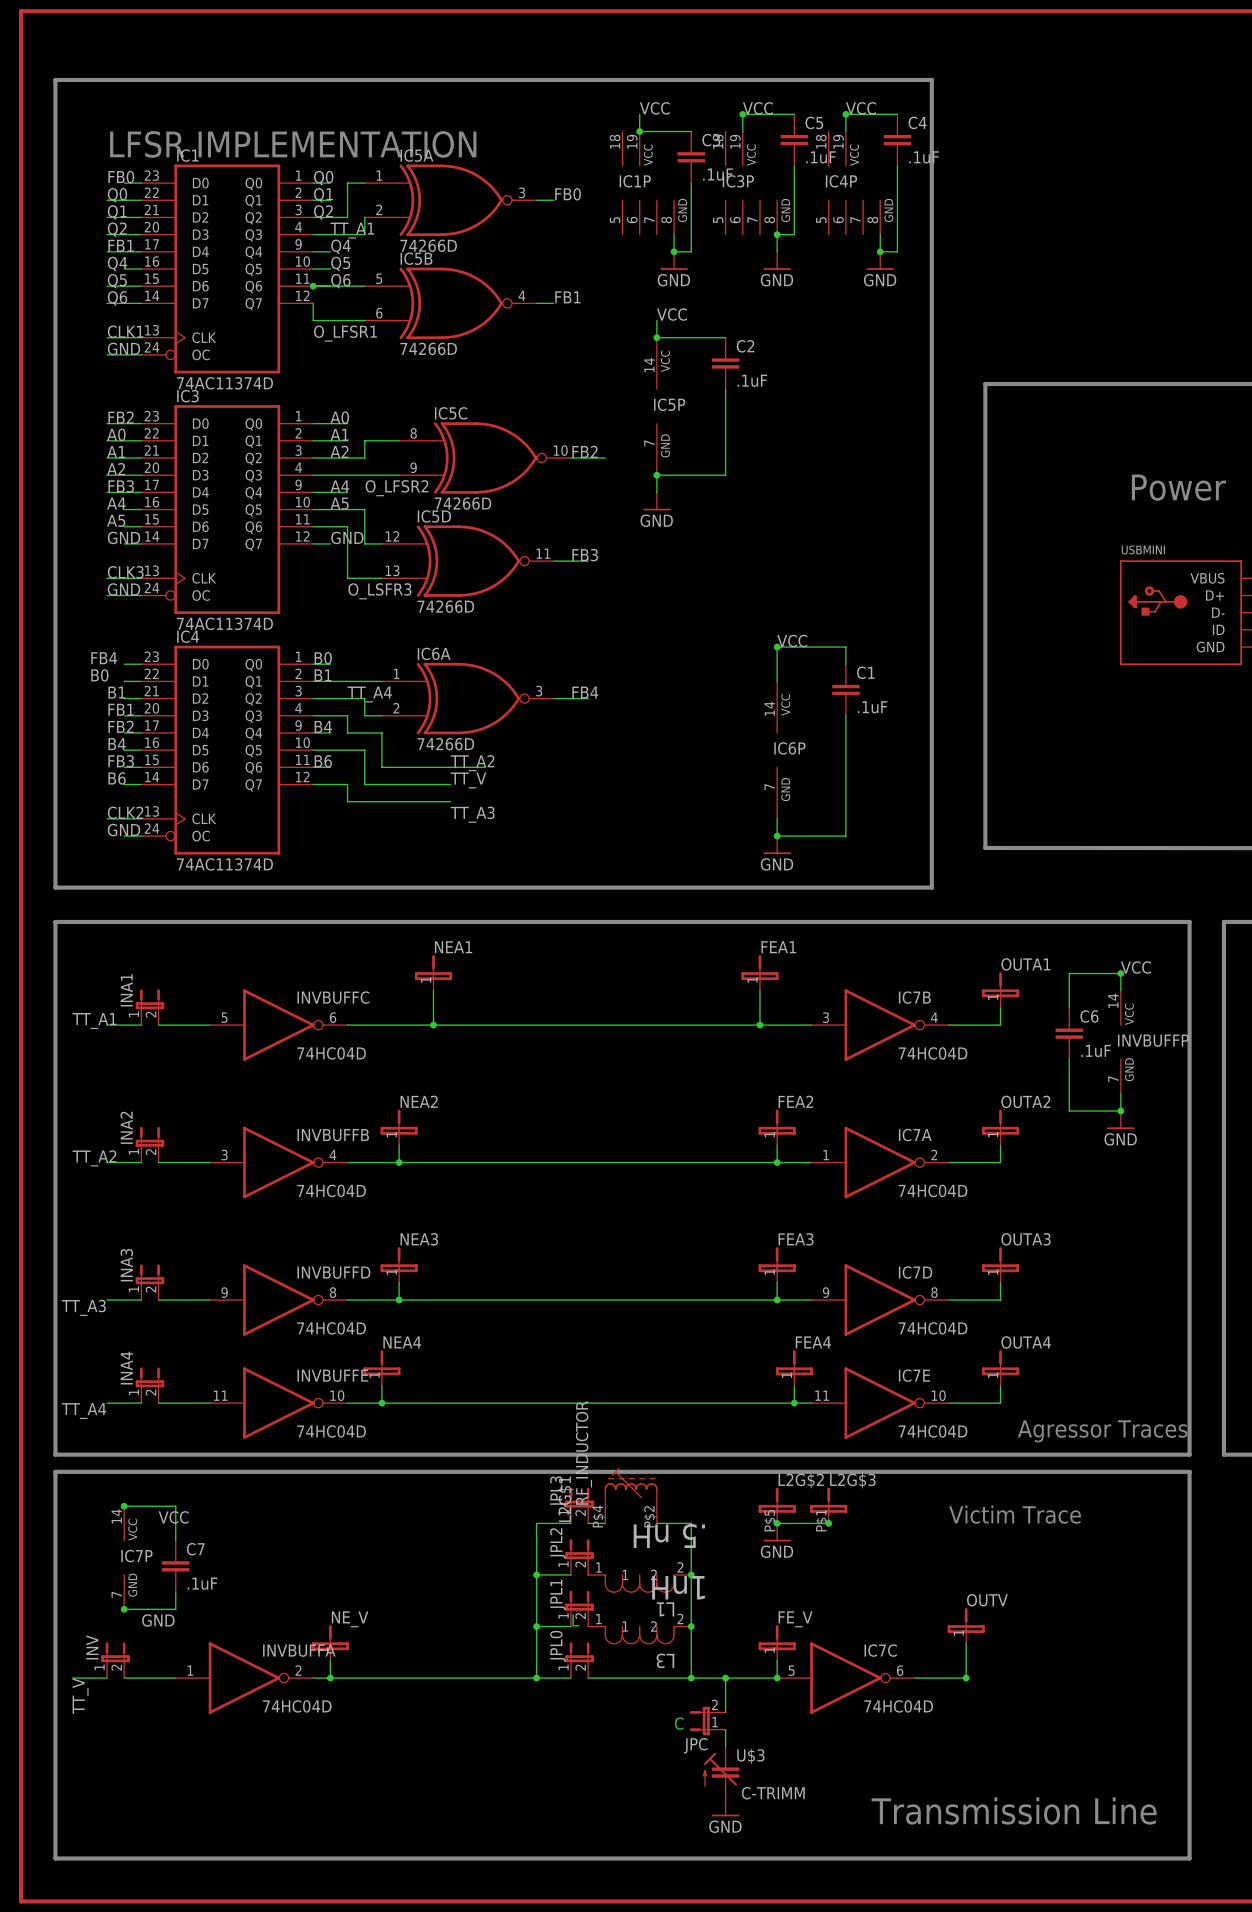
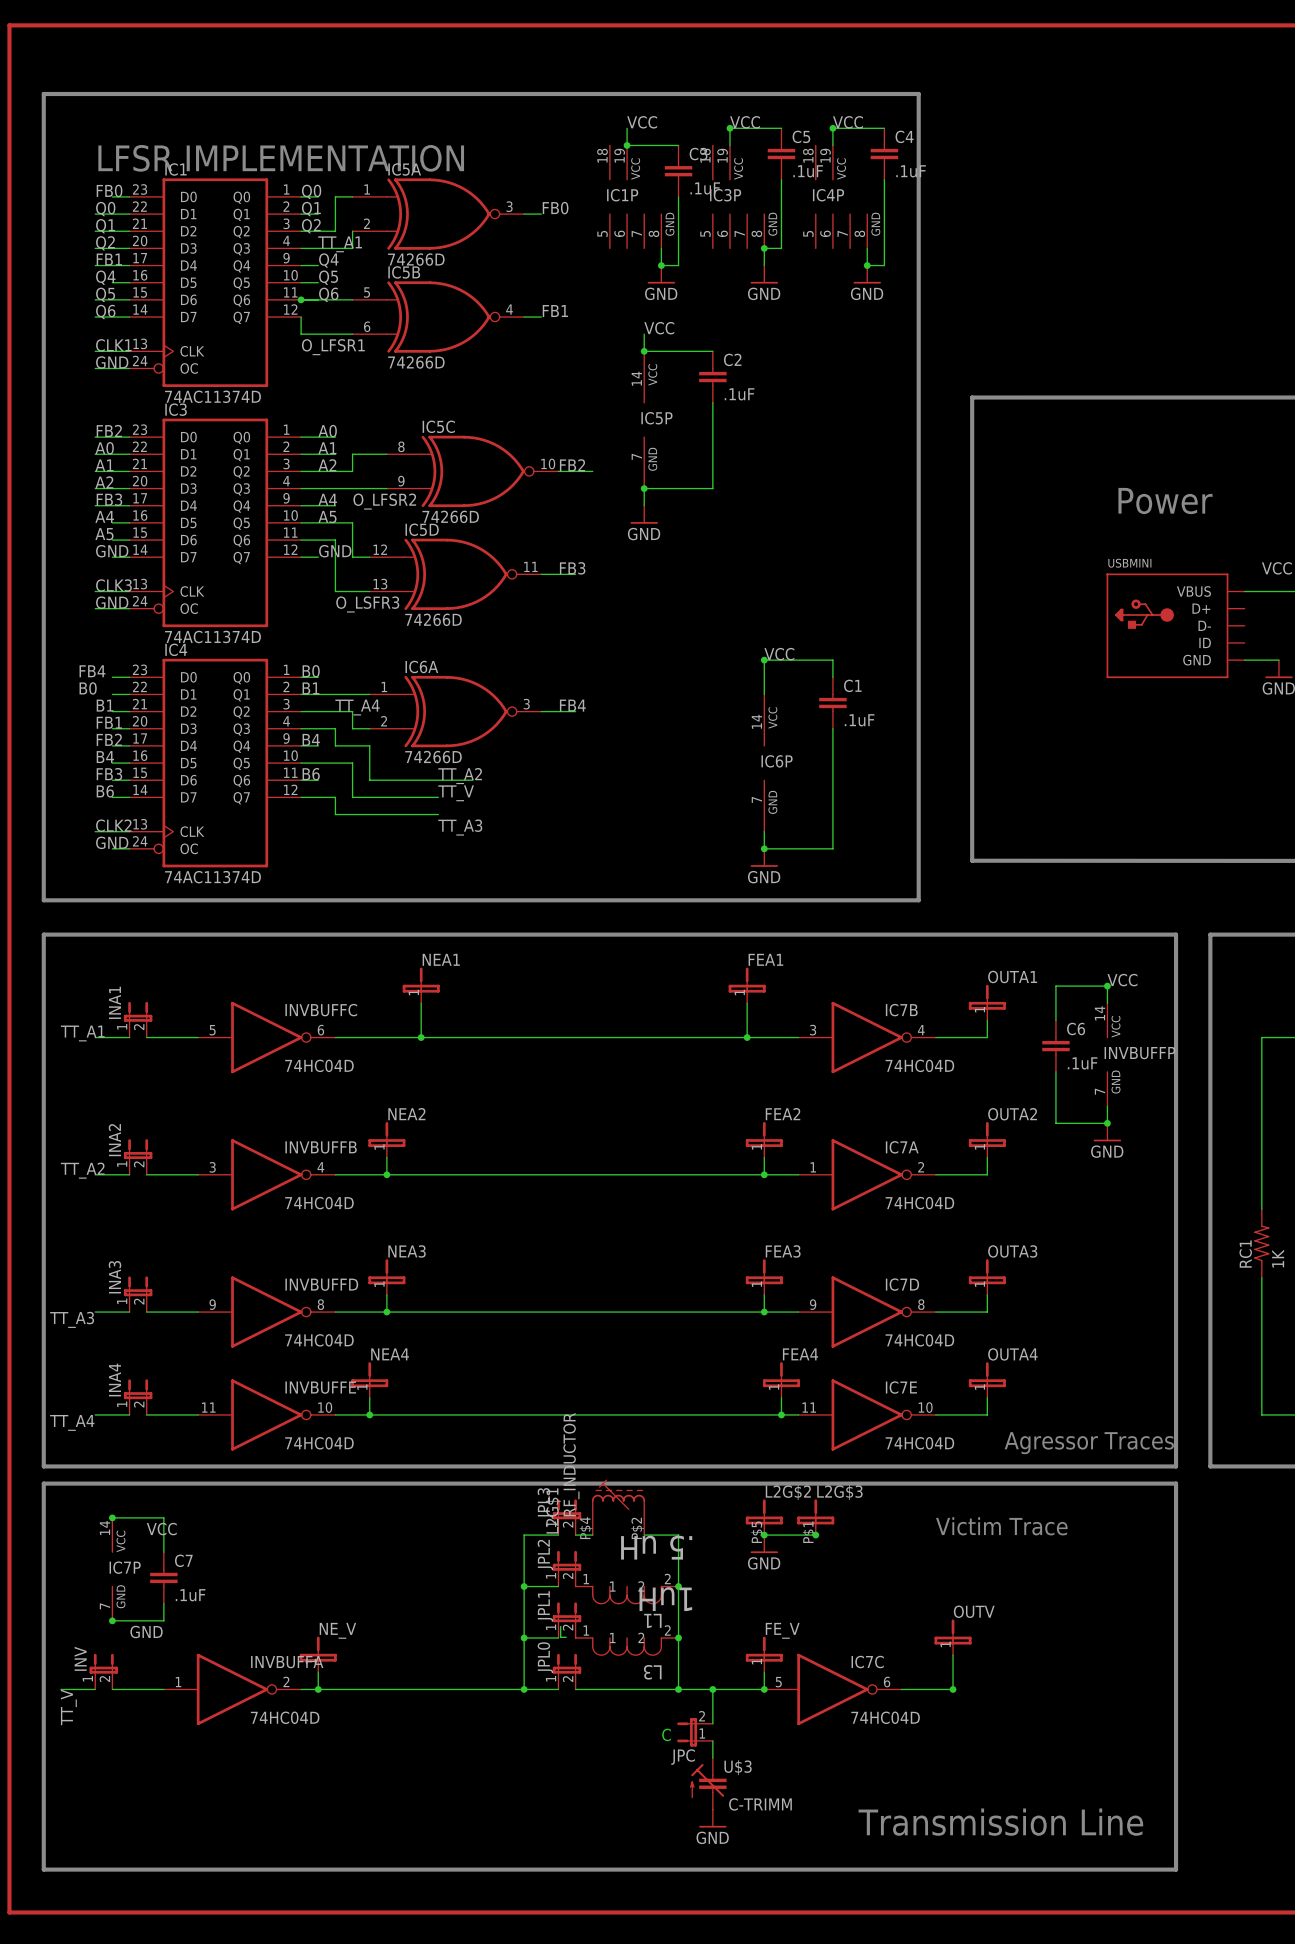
L1 value: .5 nH (669, 1535) -> .5 uH (656, 1547)
L3 value: 1nH (678, 1587) -> 1uH (665, 1599)

